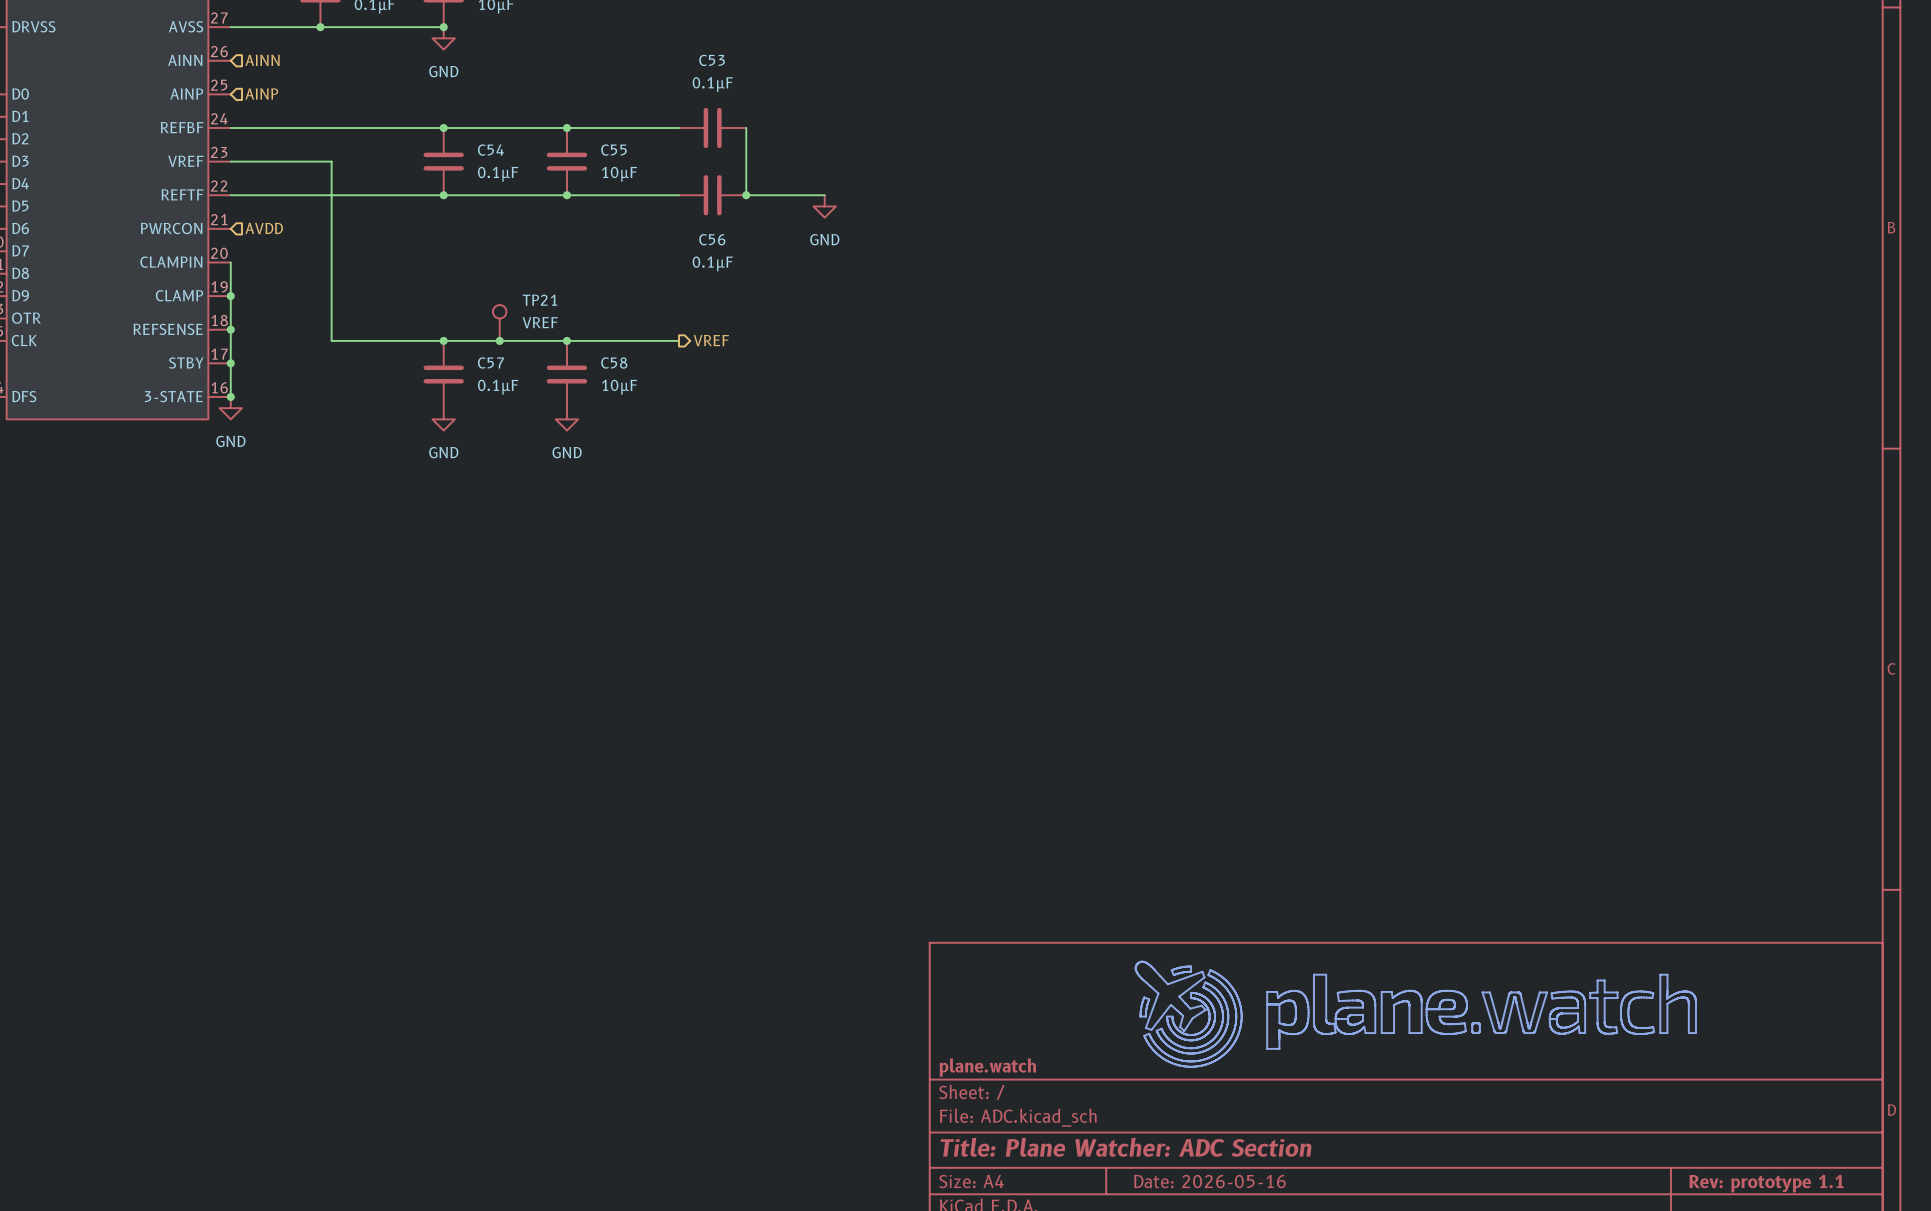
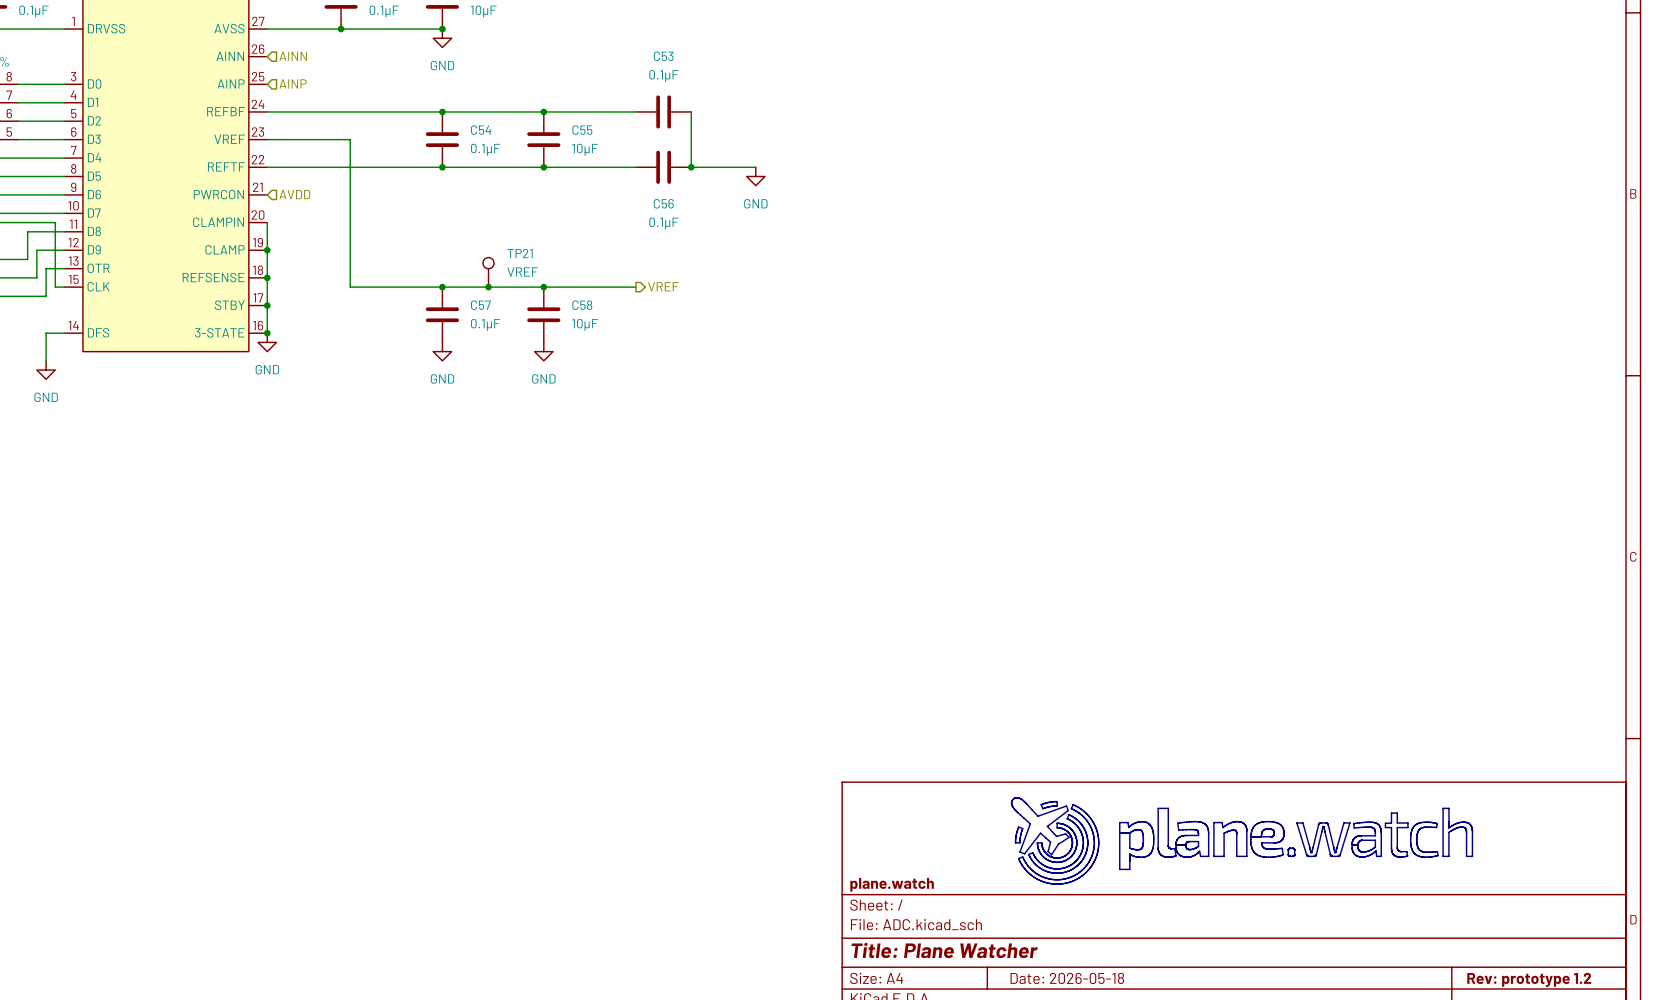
title block: Title: Plane Watcher: ADC Section (1125, 1147) -> Title: Plane Watcher (944, 950)
title block: Date: 2026-05-16 (1209, 1181) -> Date: 2026-05-18 (1067, 978)
title block: Rev: prototype 1.1 (1766, 1183) -> Rev: prototype 1.2 (1529, 979)

